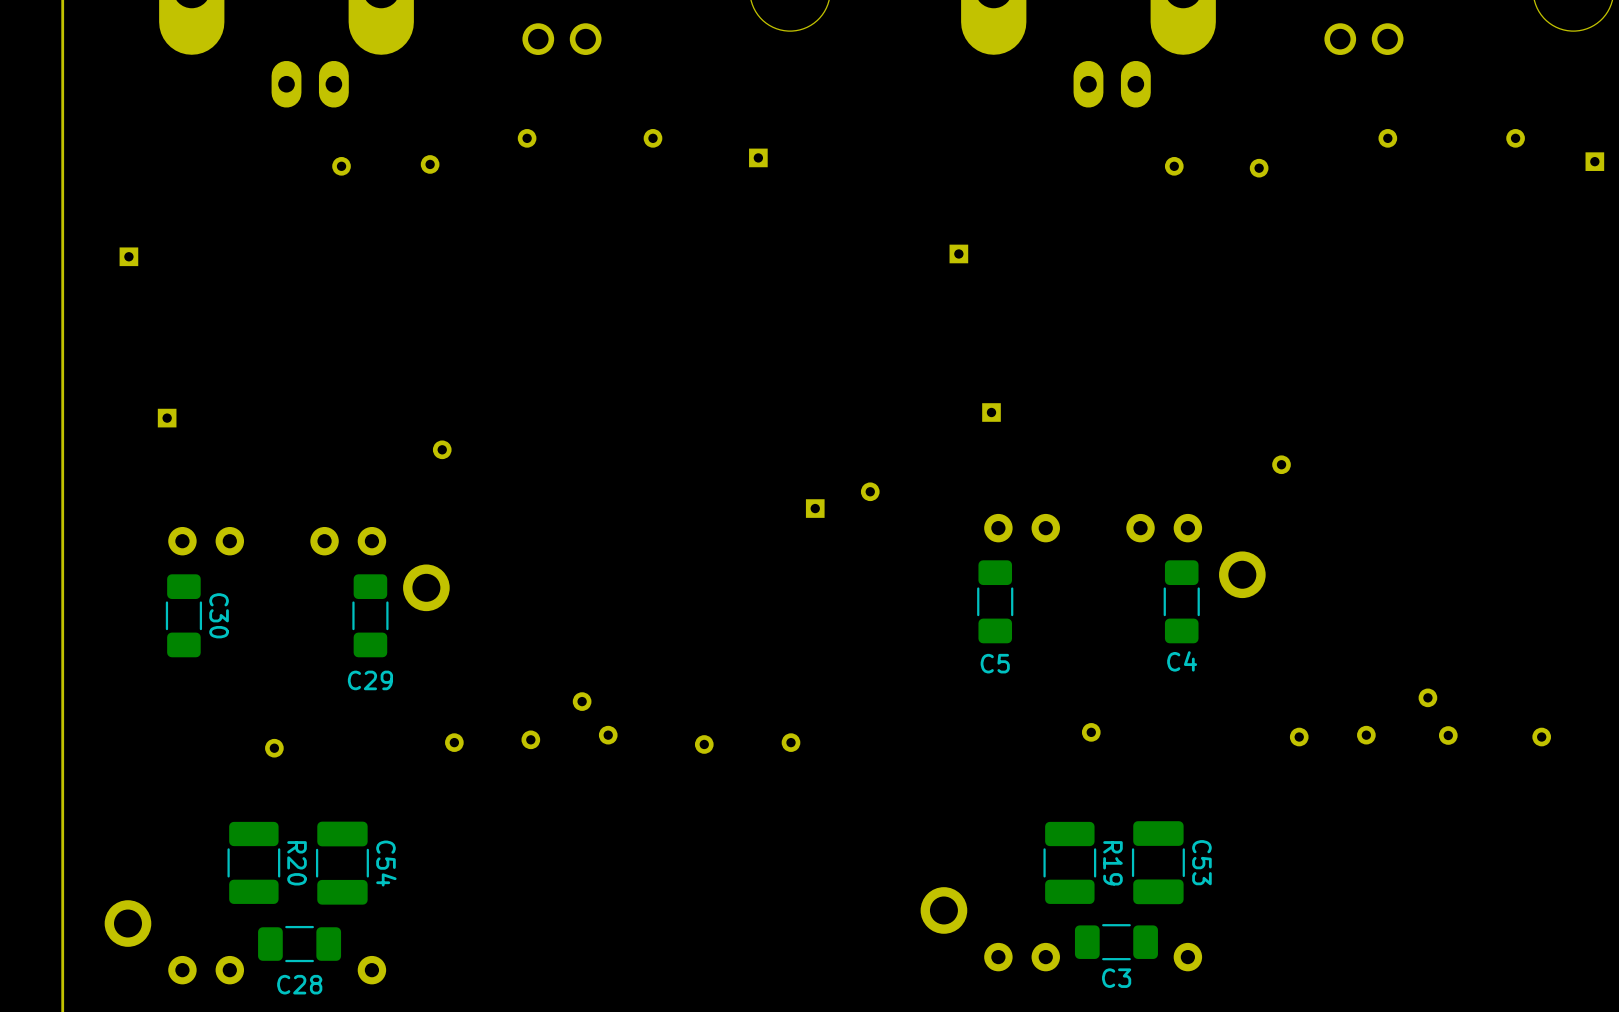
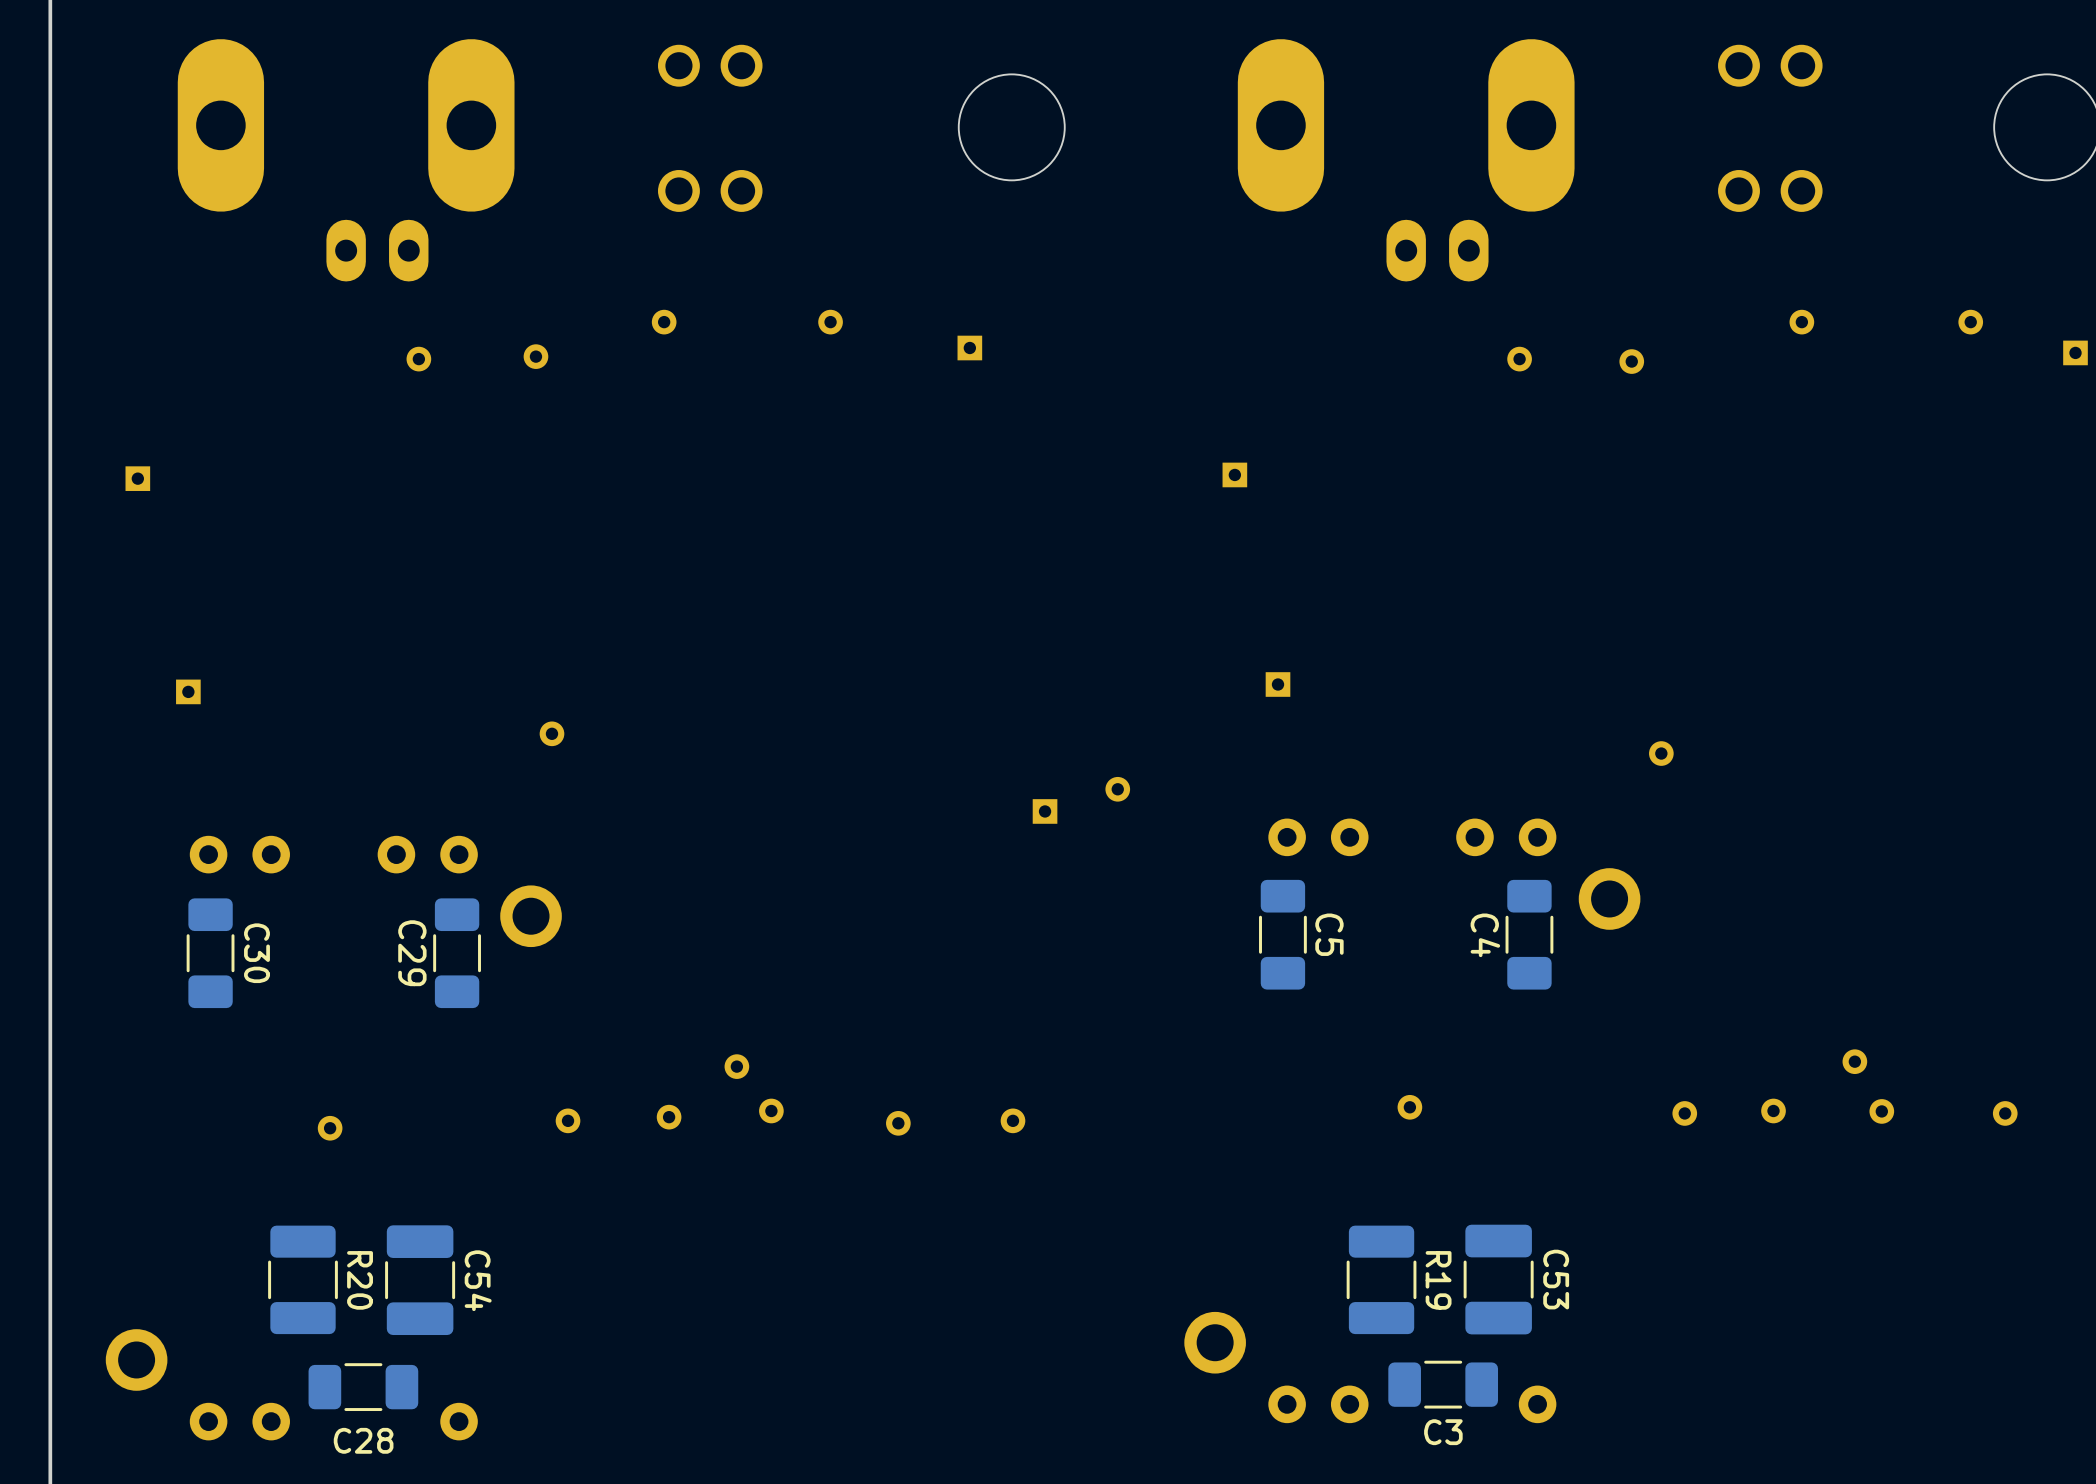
C4 name rotation: 0° (1182, 661) -> 90° clockwise (1485, 935)
C4 name position: C4 (1182, 661) -> C4 (1485, 935)
C5 name rotation: 0° (995, 663) -> 90° clockwise (1329, 934)
C5 name position: C5 (995, 663) -> C5 (1329, 934)
C29 name rotation: 0° (370, 680) -> 90° clockwise (412, 953)
C29 name position: C29 (370, 680) -> C29 (412, 953)

